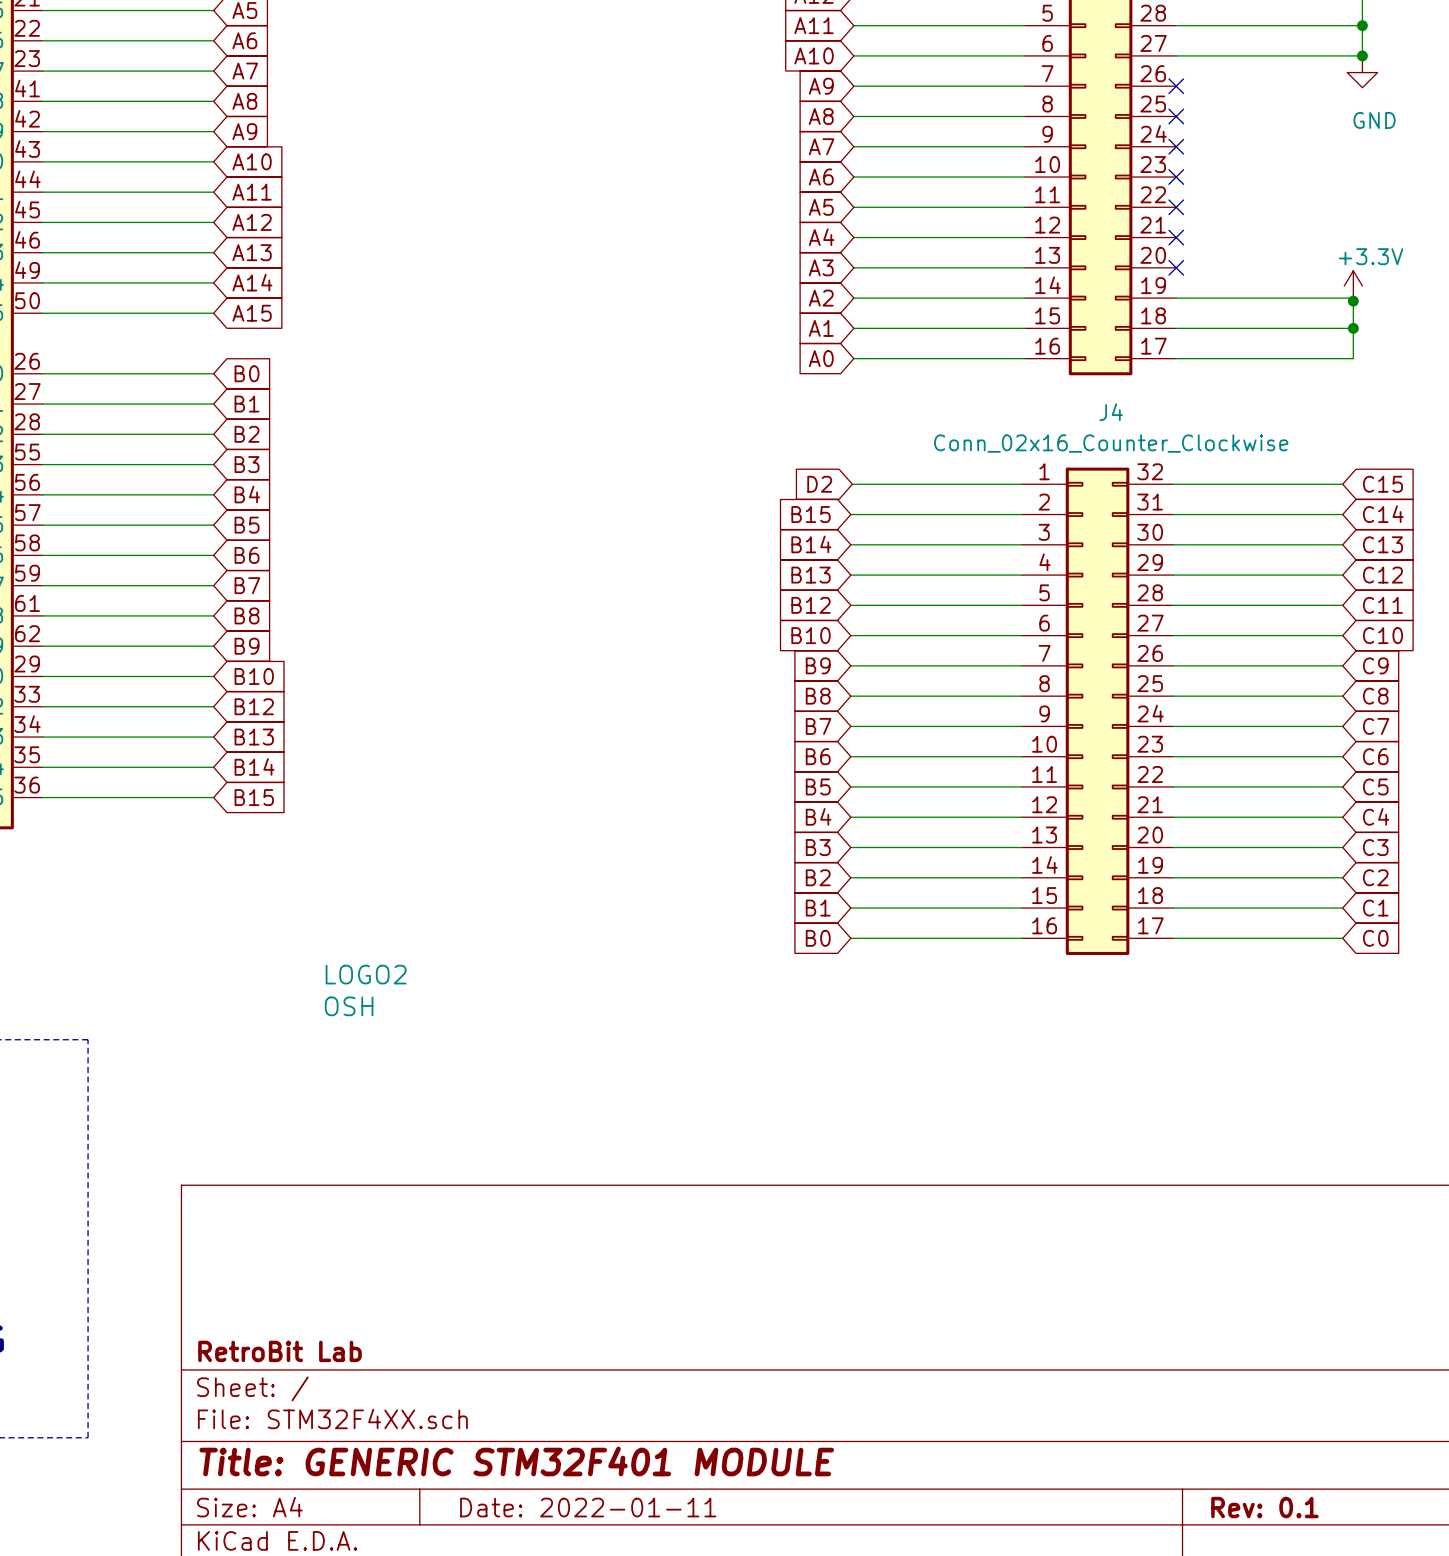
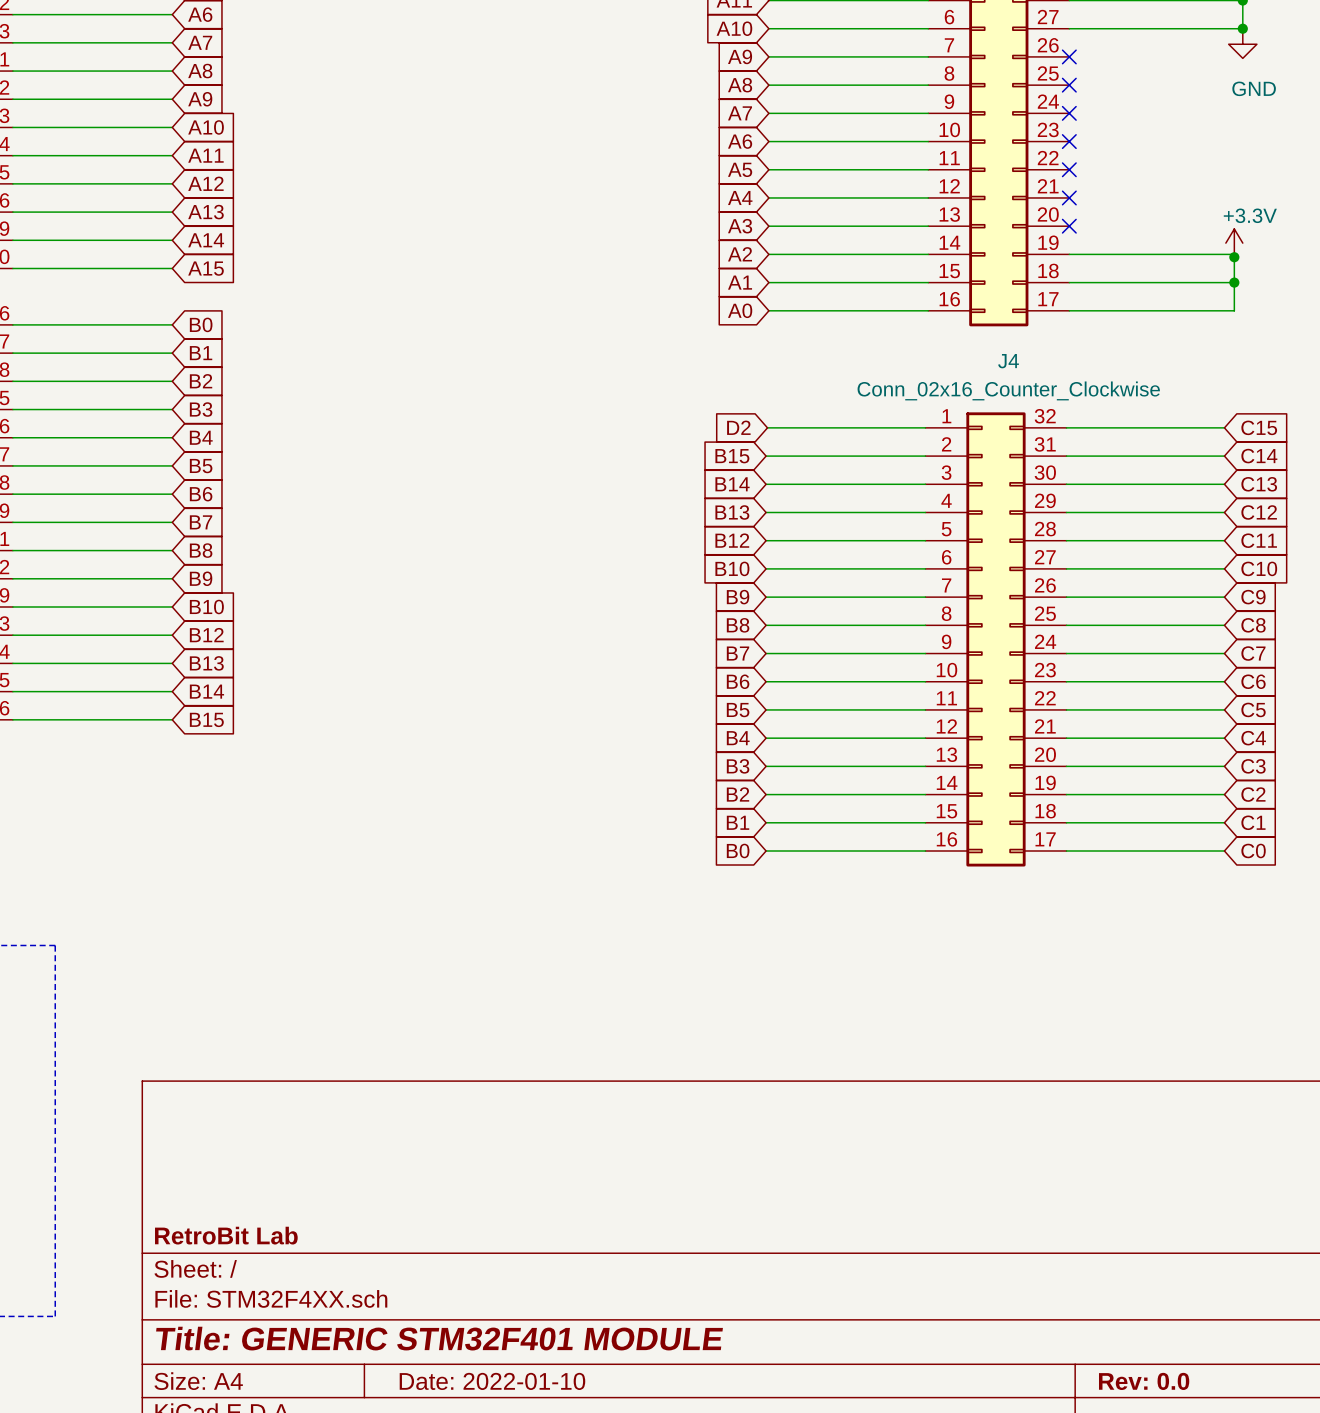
LOGO2: OSH (365, 990) -> none
title block: Date: 2022-01-11 (588, 1507) -> Date: 2022-01-10 (492, 1381)
title block: Rev: 0.1 (1264, 1507) -> Rev: 0.0 (1144, 1381)

